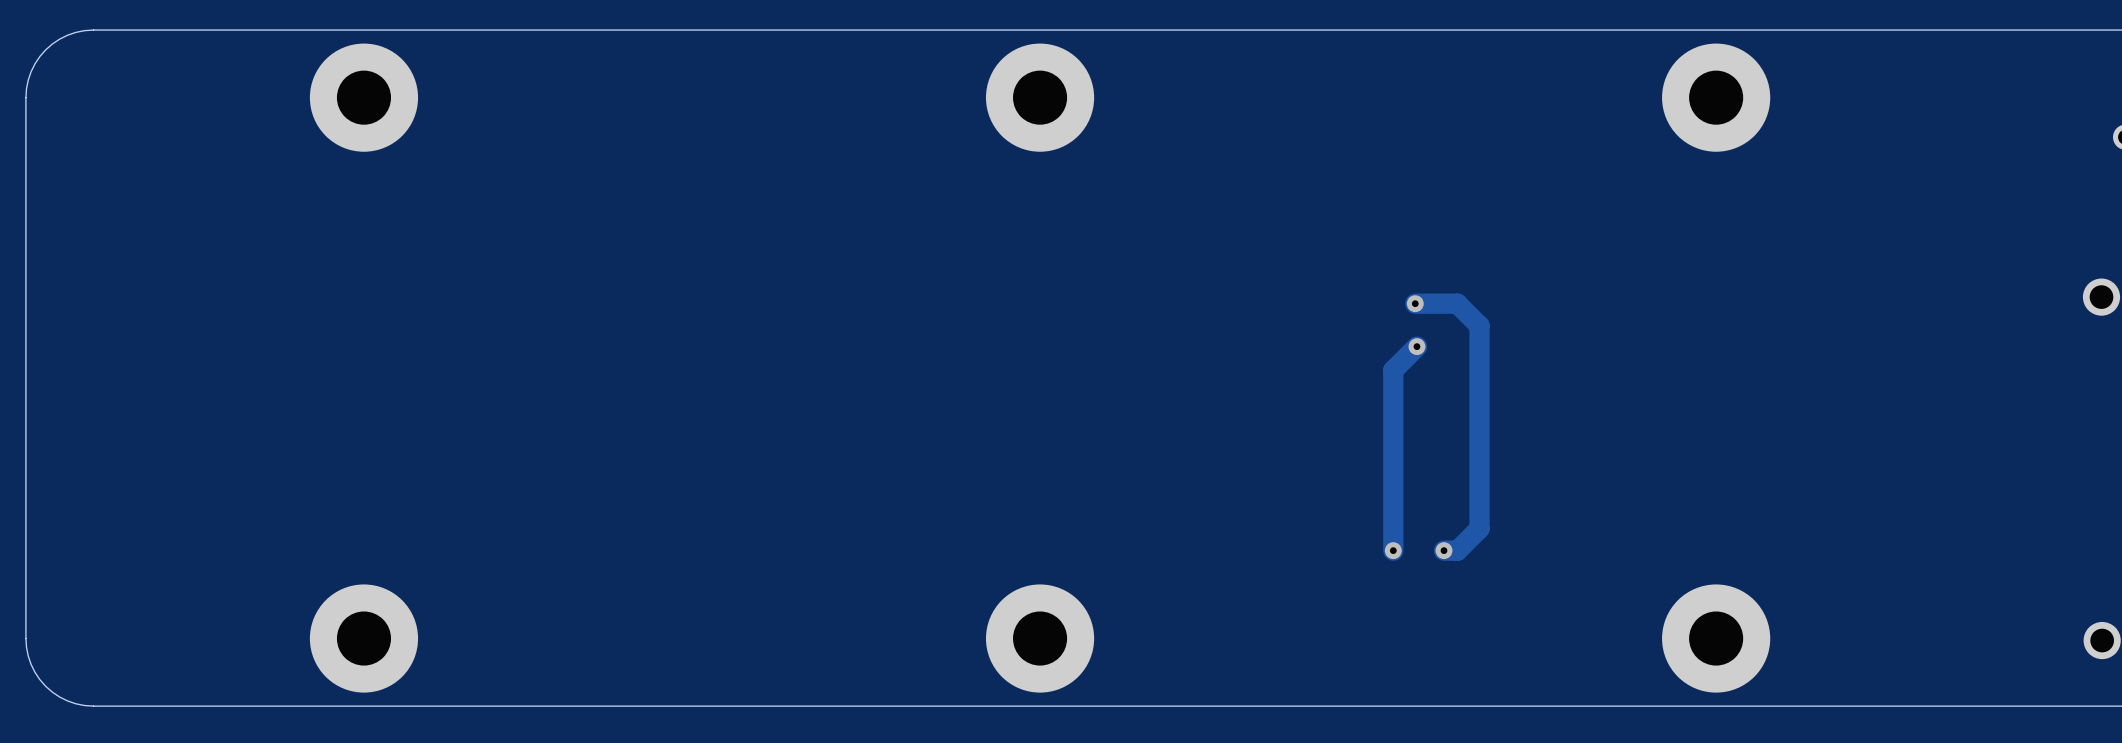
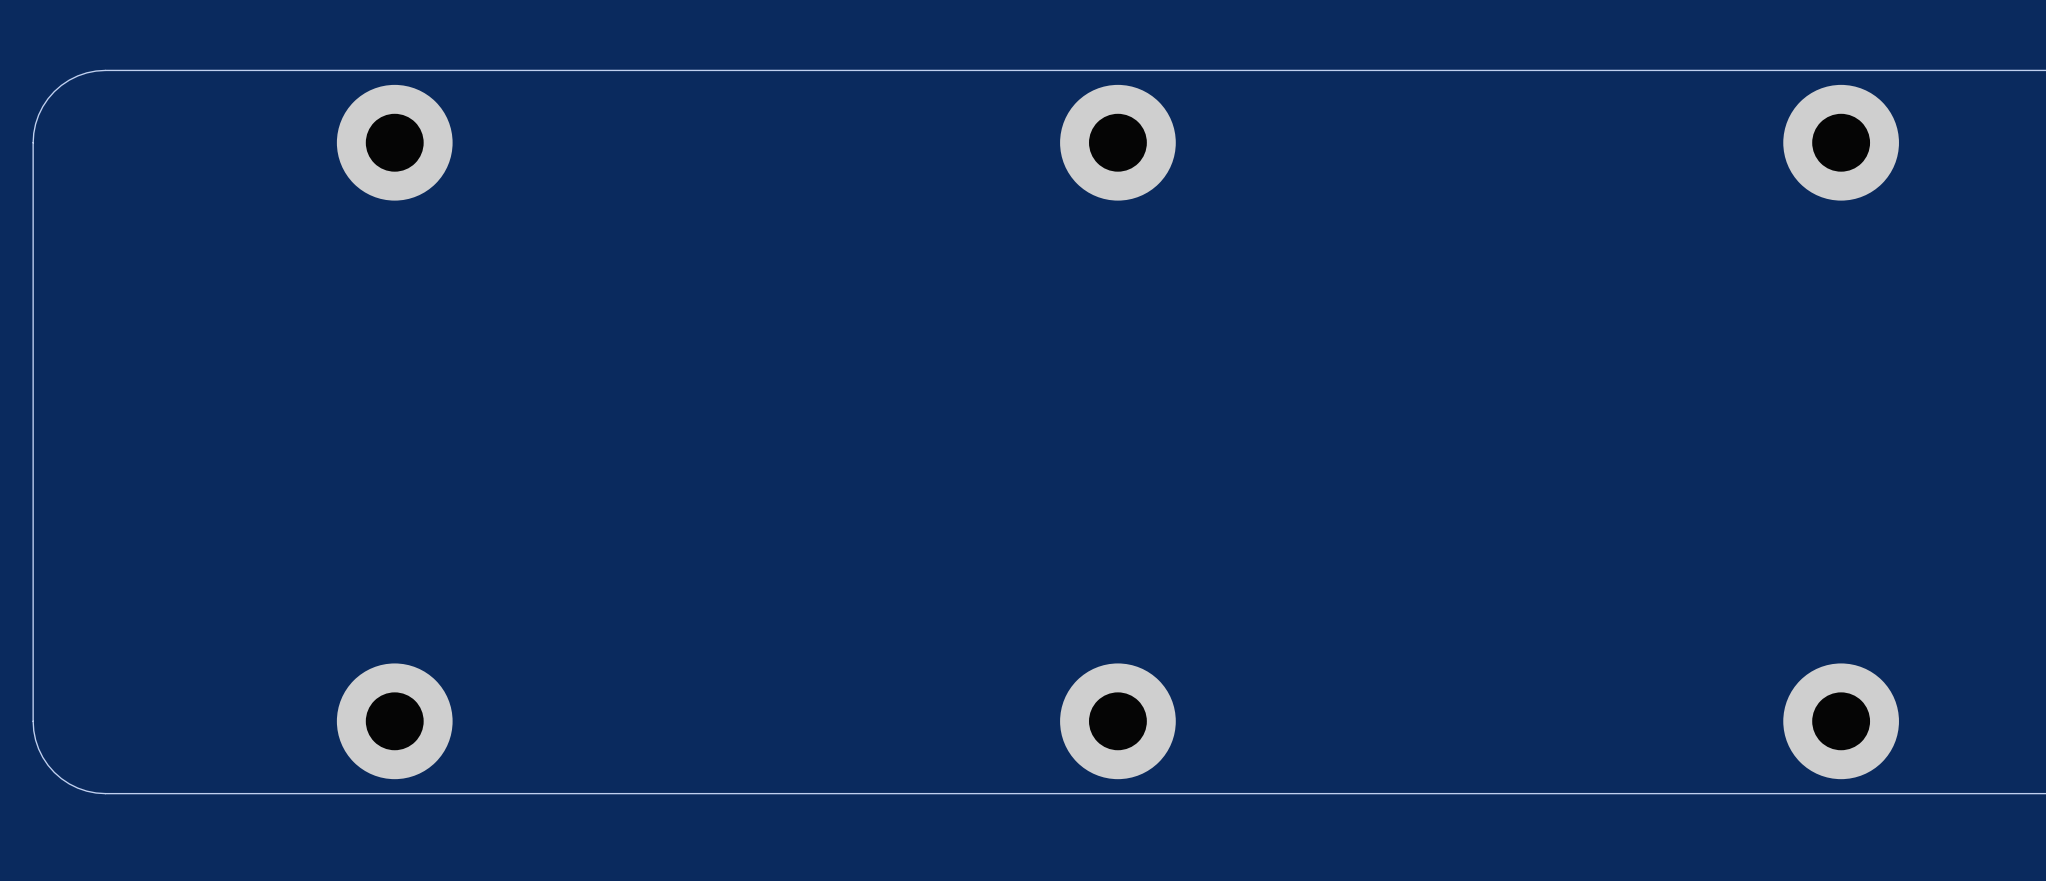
track: (1415, 303) (1457, 303) (1479, 325) (1479, 528) (1457, 550) (1444, 550) -> none
via: (1415, 303) -> none
track: (1416, 346) (1393, 370) (1393, 550) -> none
via: (1416, 346) -> none
via: (1393, 550) -> none
via: (1444, 550) -> none

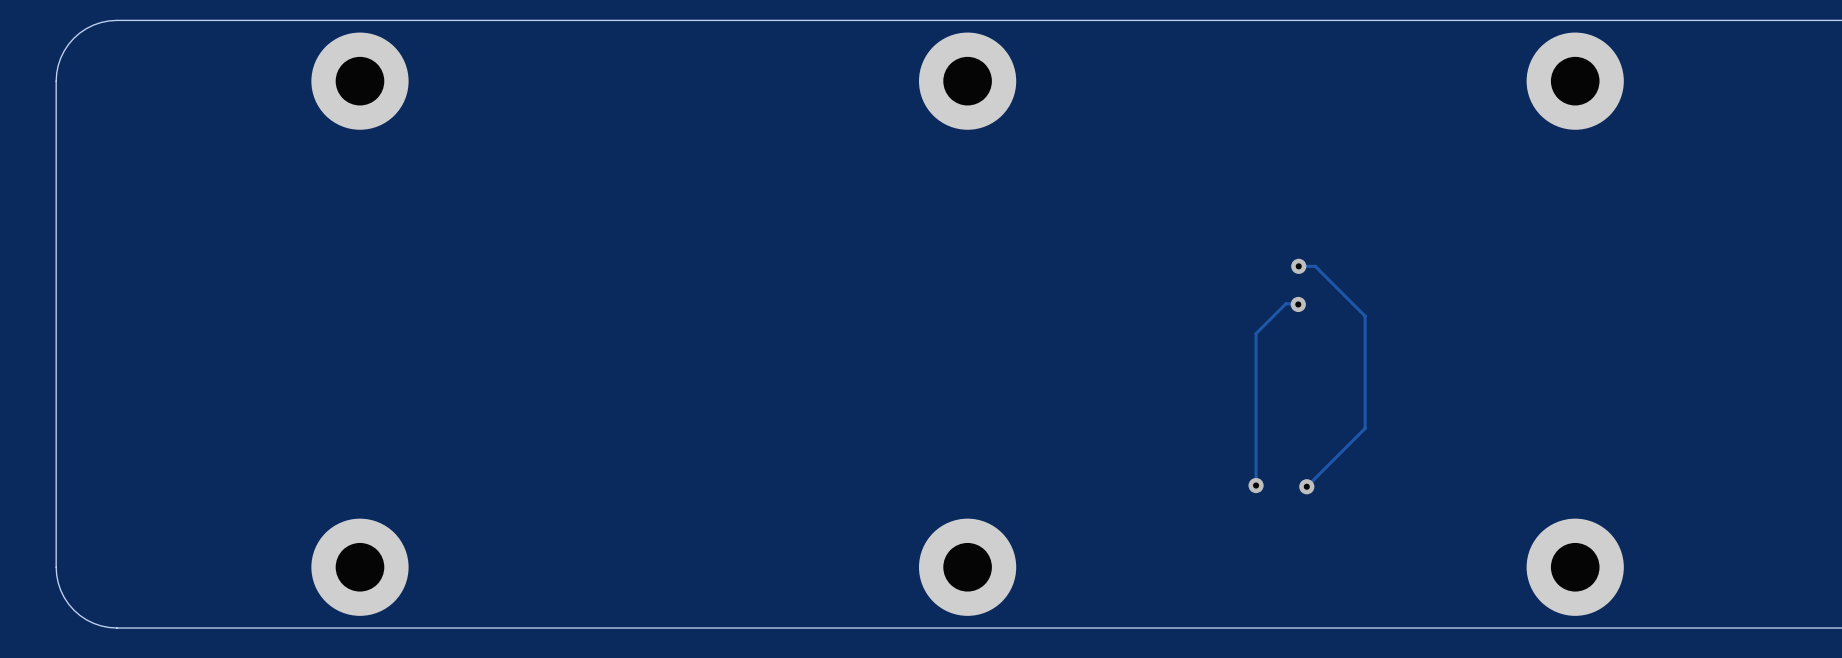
track: none -> (1298, 266) (1315, 266) (1365, 316) (1365, 428) (1306, 486)
via: none -> (1298, 266)
track: none -> (1298, 304) (1285, 303) (1256, 333) (1256, 485)
via: none -> (1298, 304)
via: none -> (1256, 485)
via: none -> (1306, 486)

